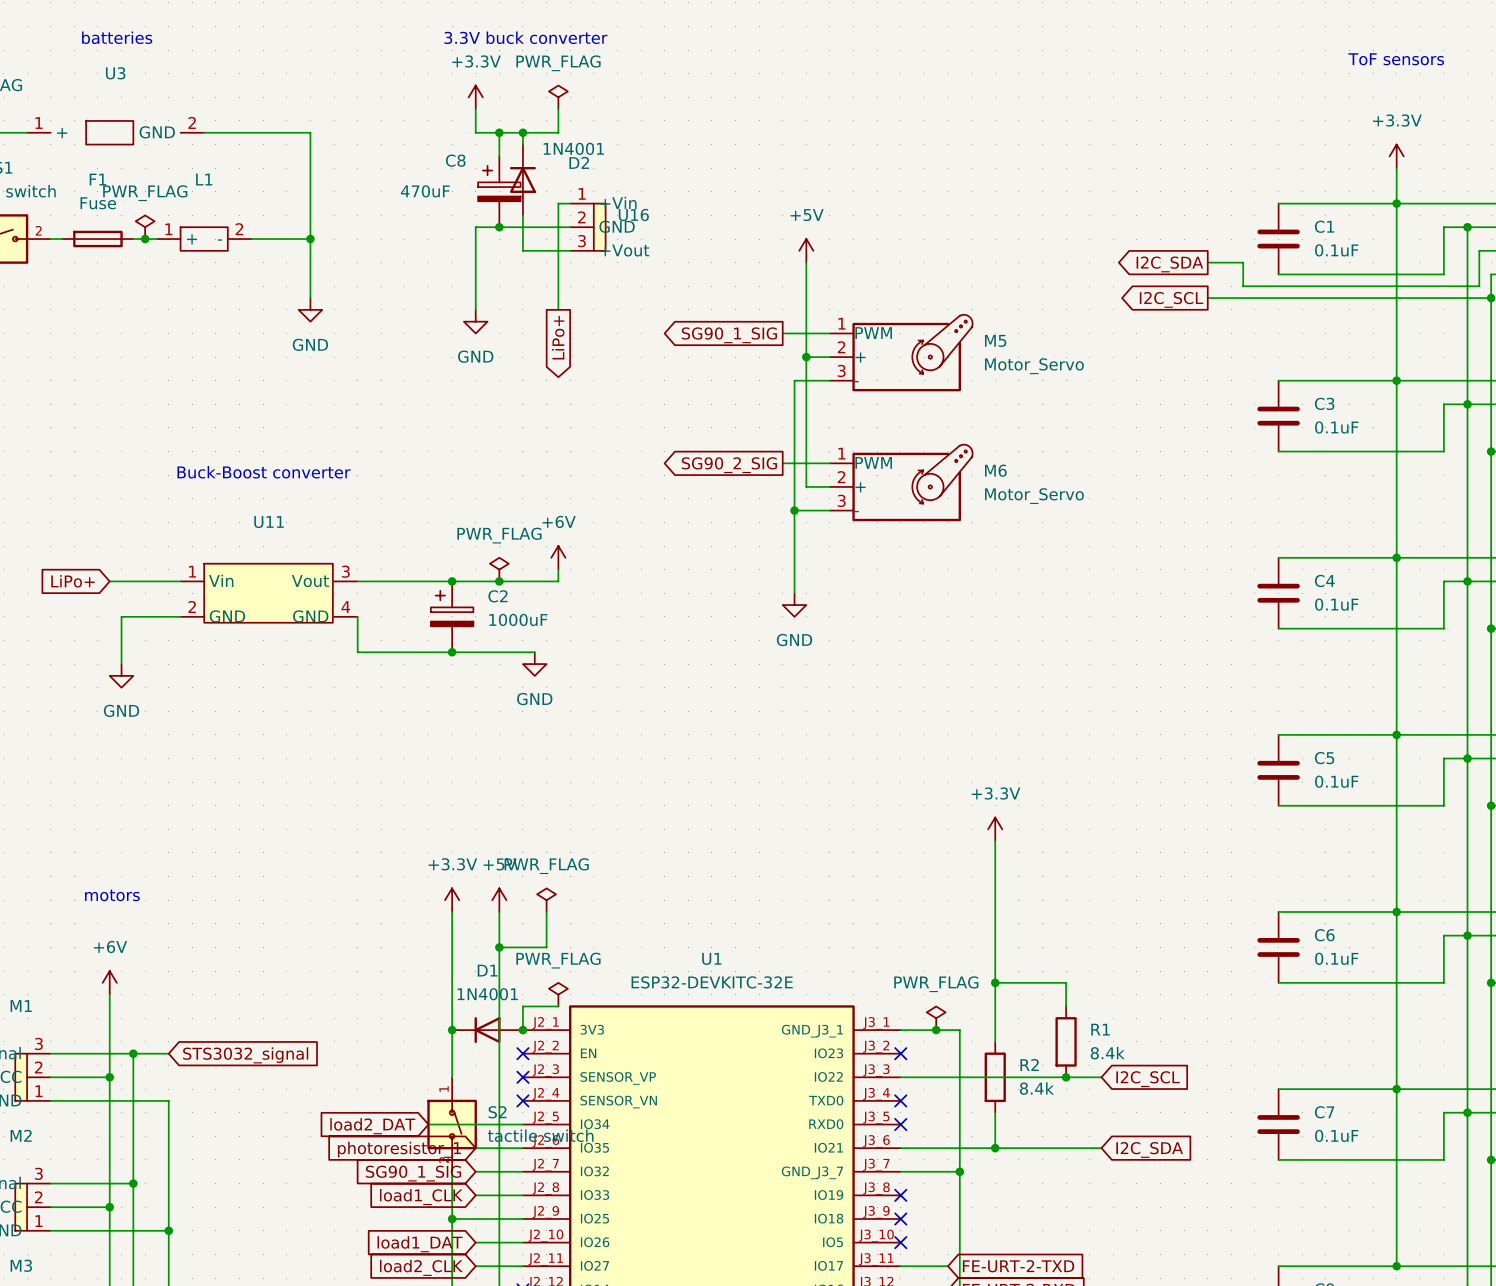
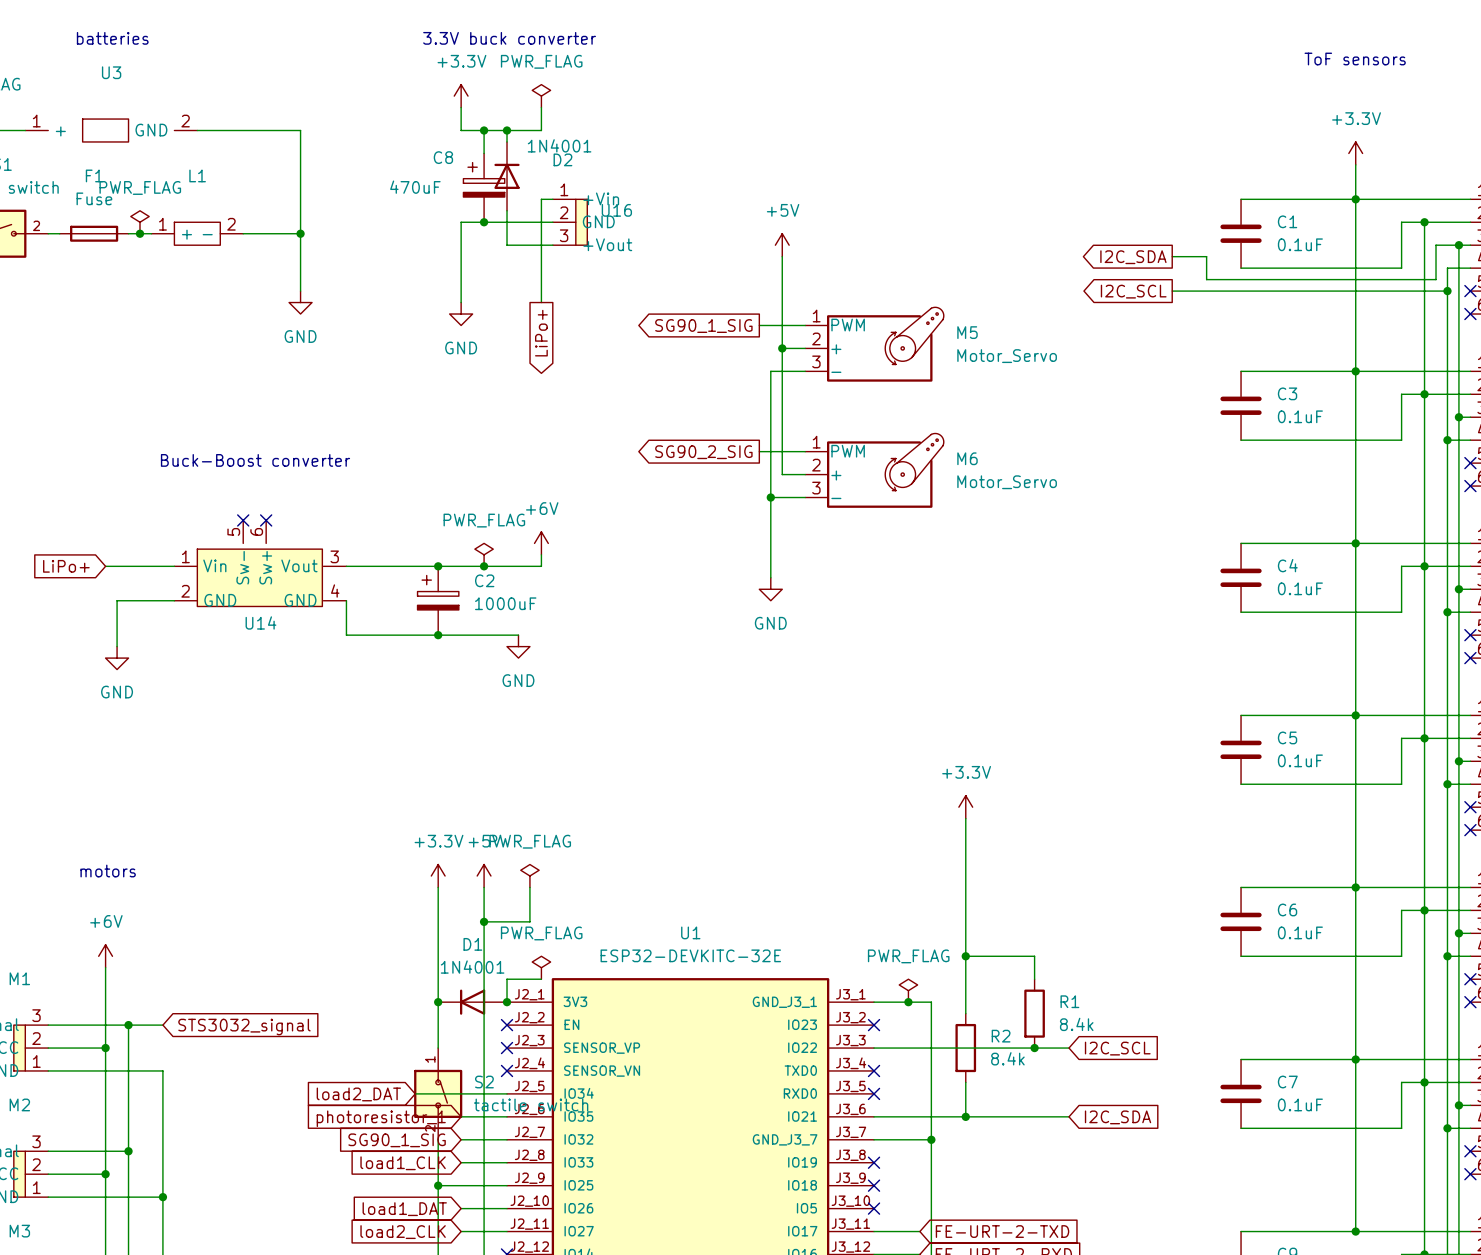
no-connect mark: none -> (243, 520)
no-connect mark: none -> (266, 520)
U14: none -> (260, 563)
U11: (269, 593) -> none

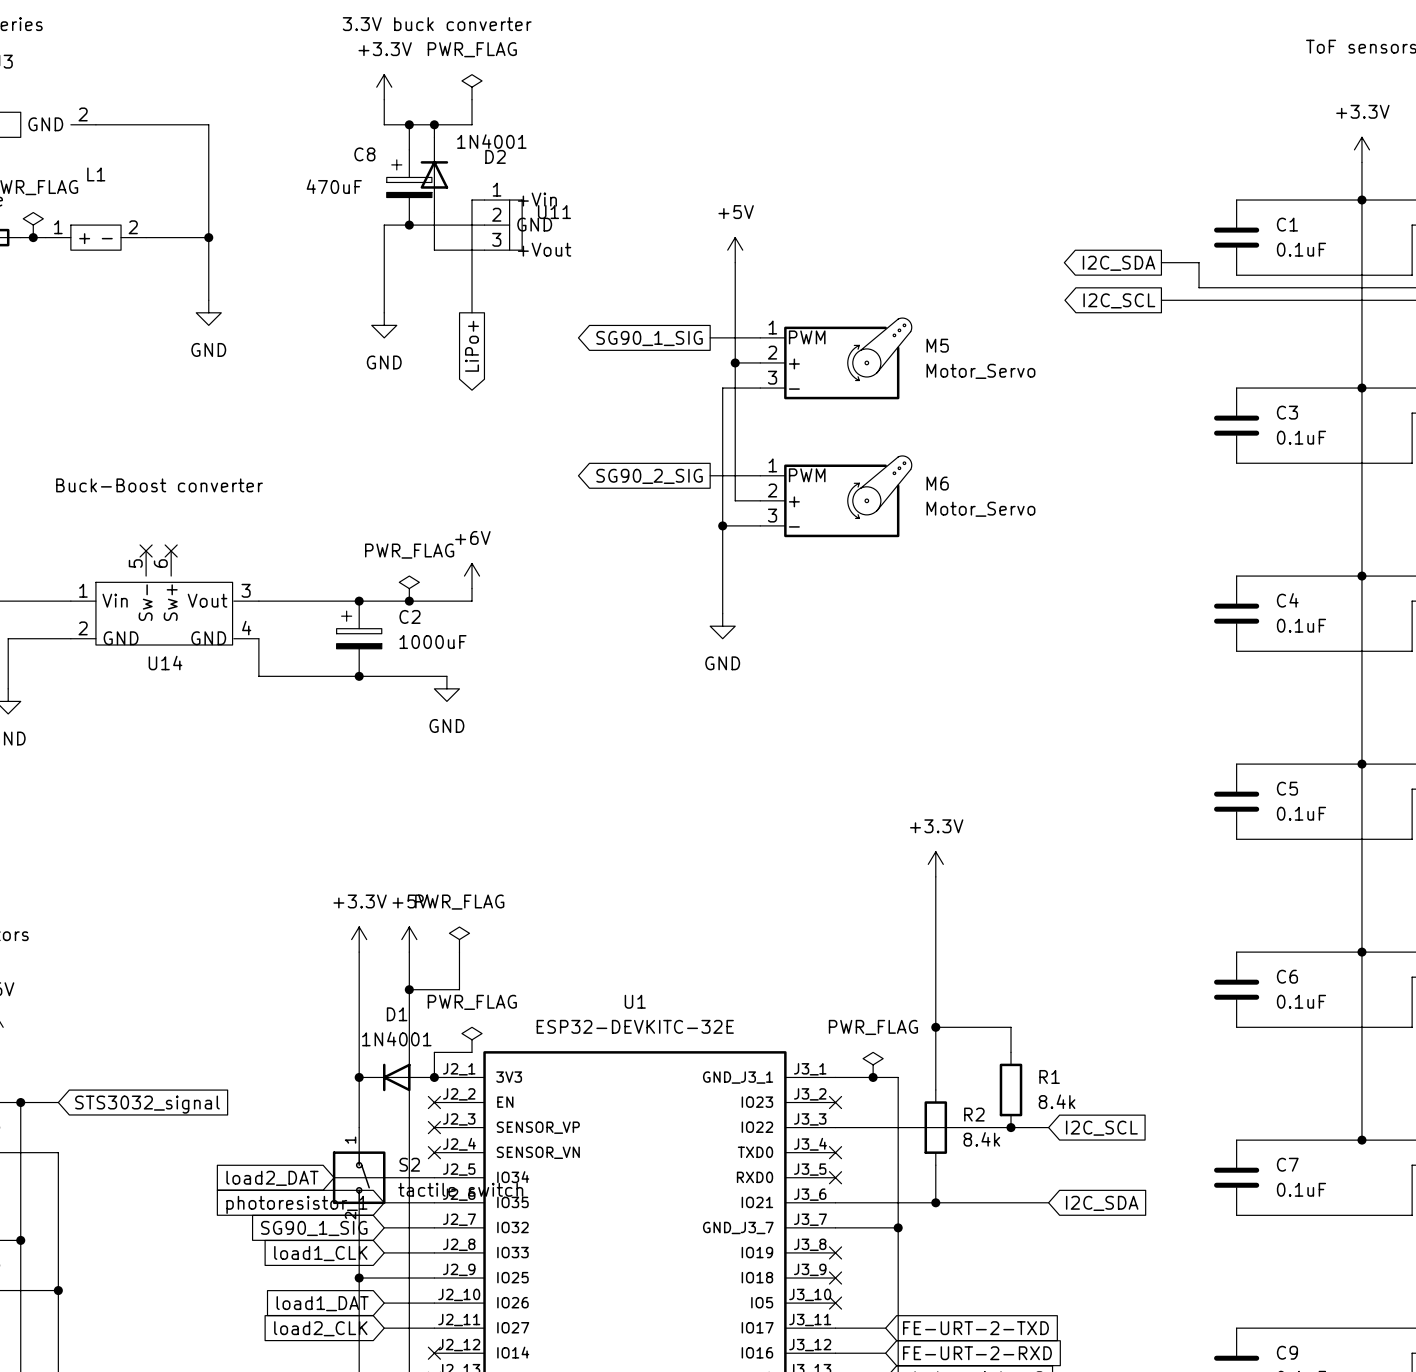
U16 name: U16 (616, 210) -> U11 (554, 212)
wire: (1355, 1059) (1355, 1231) -> none
junction: (1355, 1231) -> none

